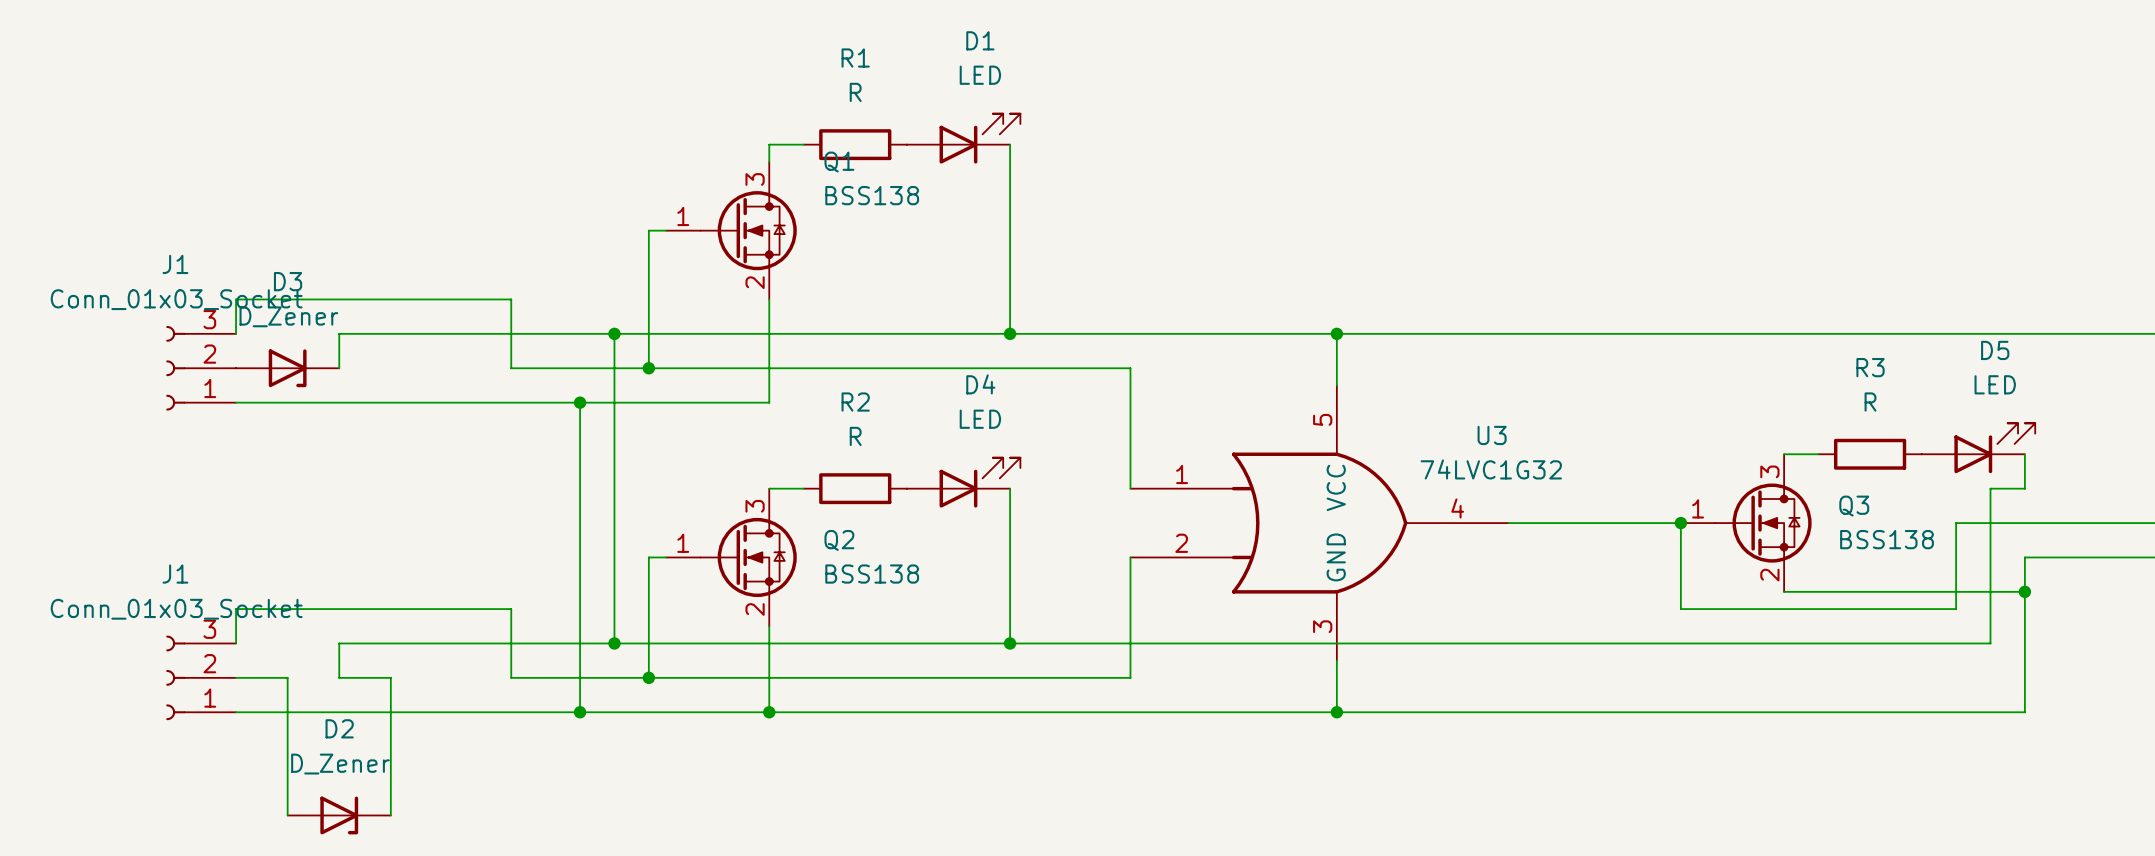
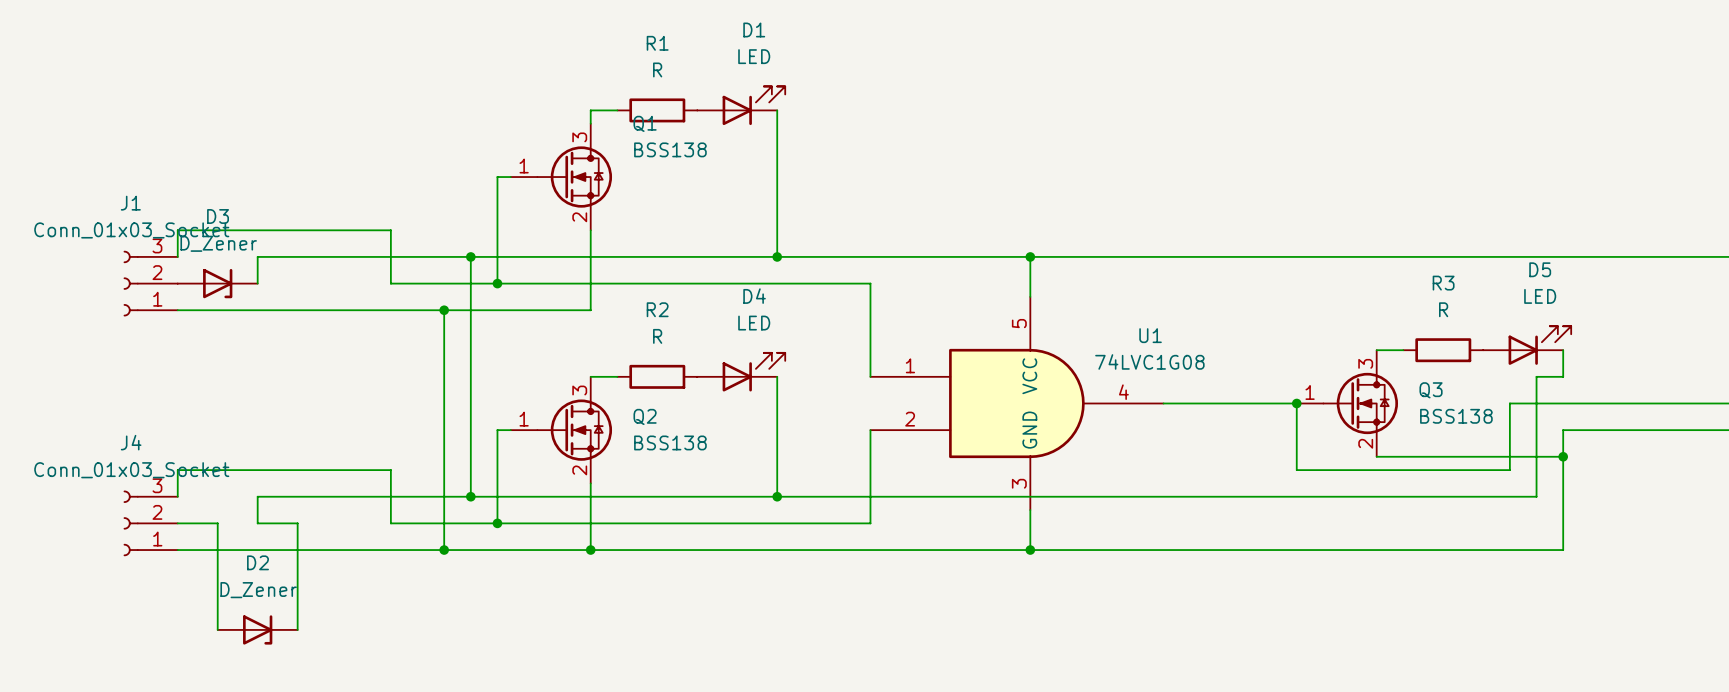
U3: 74LVC1G32 (1319, 523) -> none
U1: none -> 74LVC1G08 (1017, 403)
J1 name: J1 (175, 574) -> J4 (131, 442)

